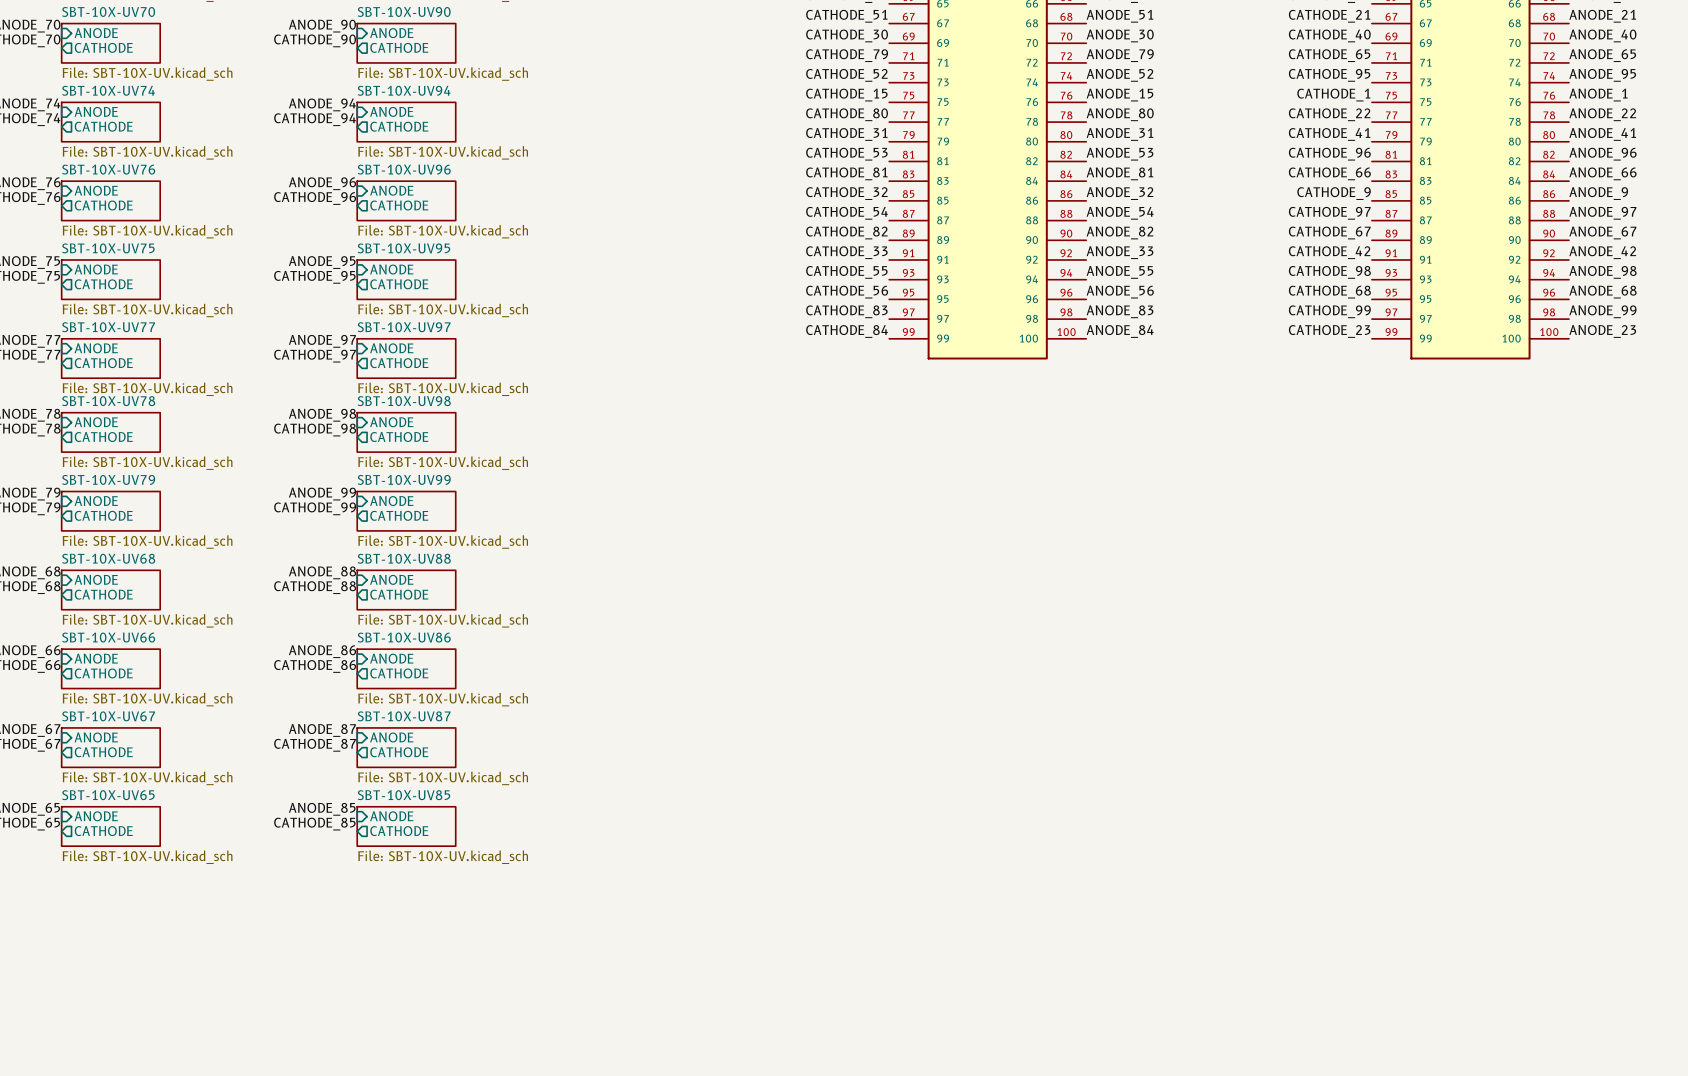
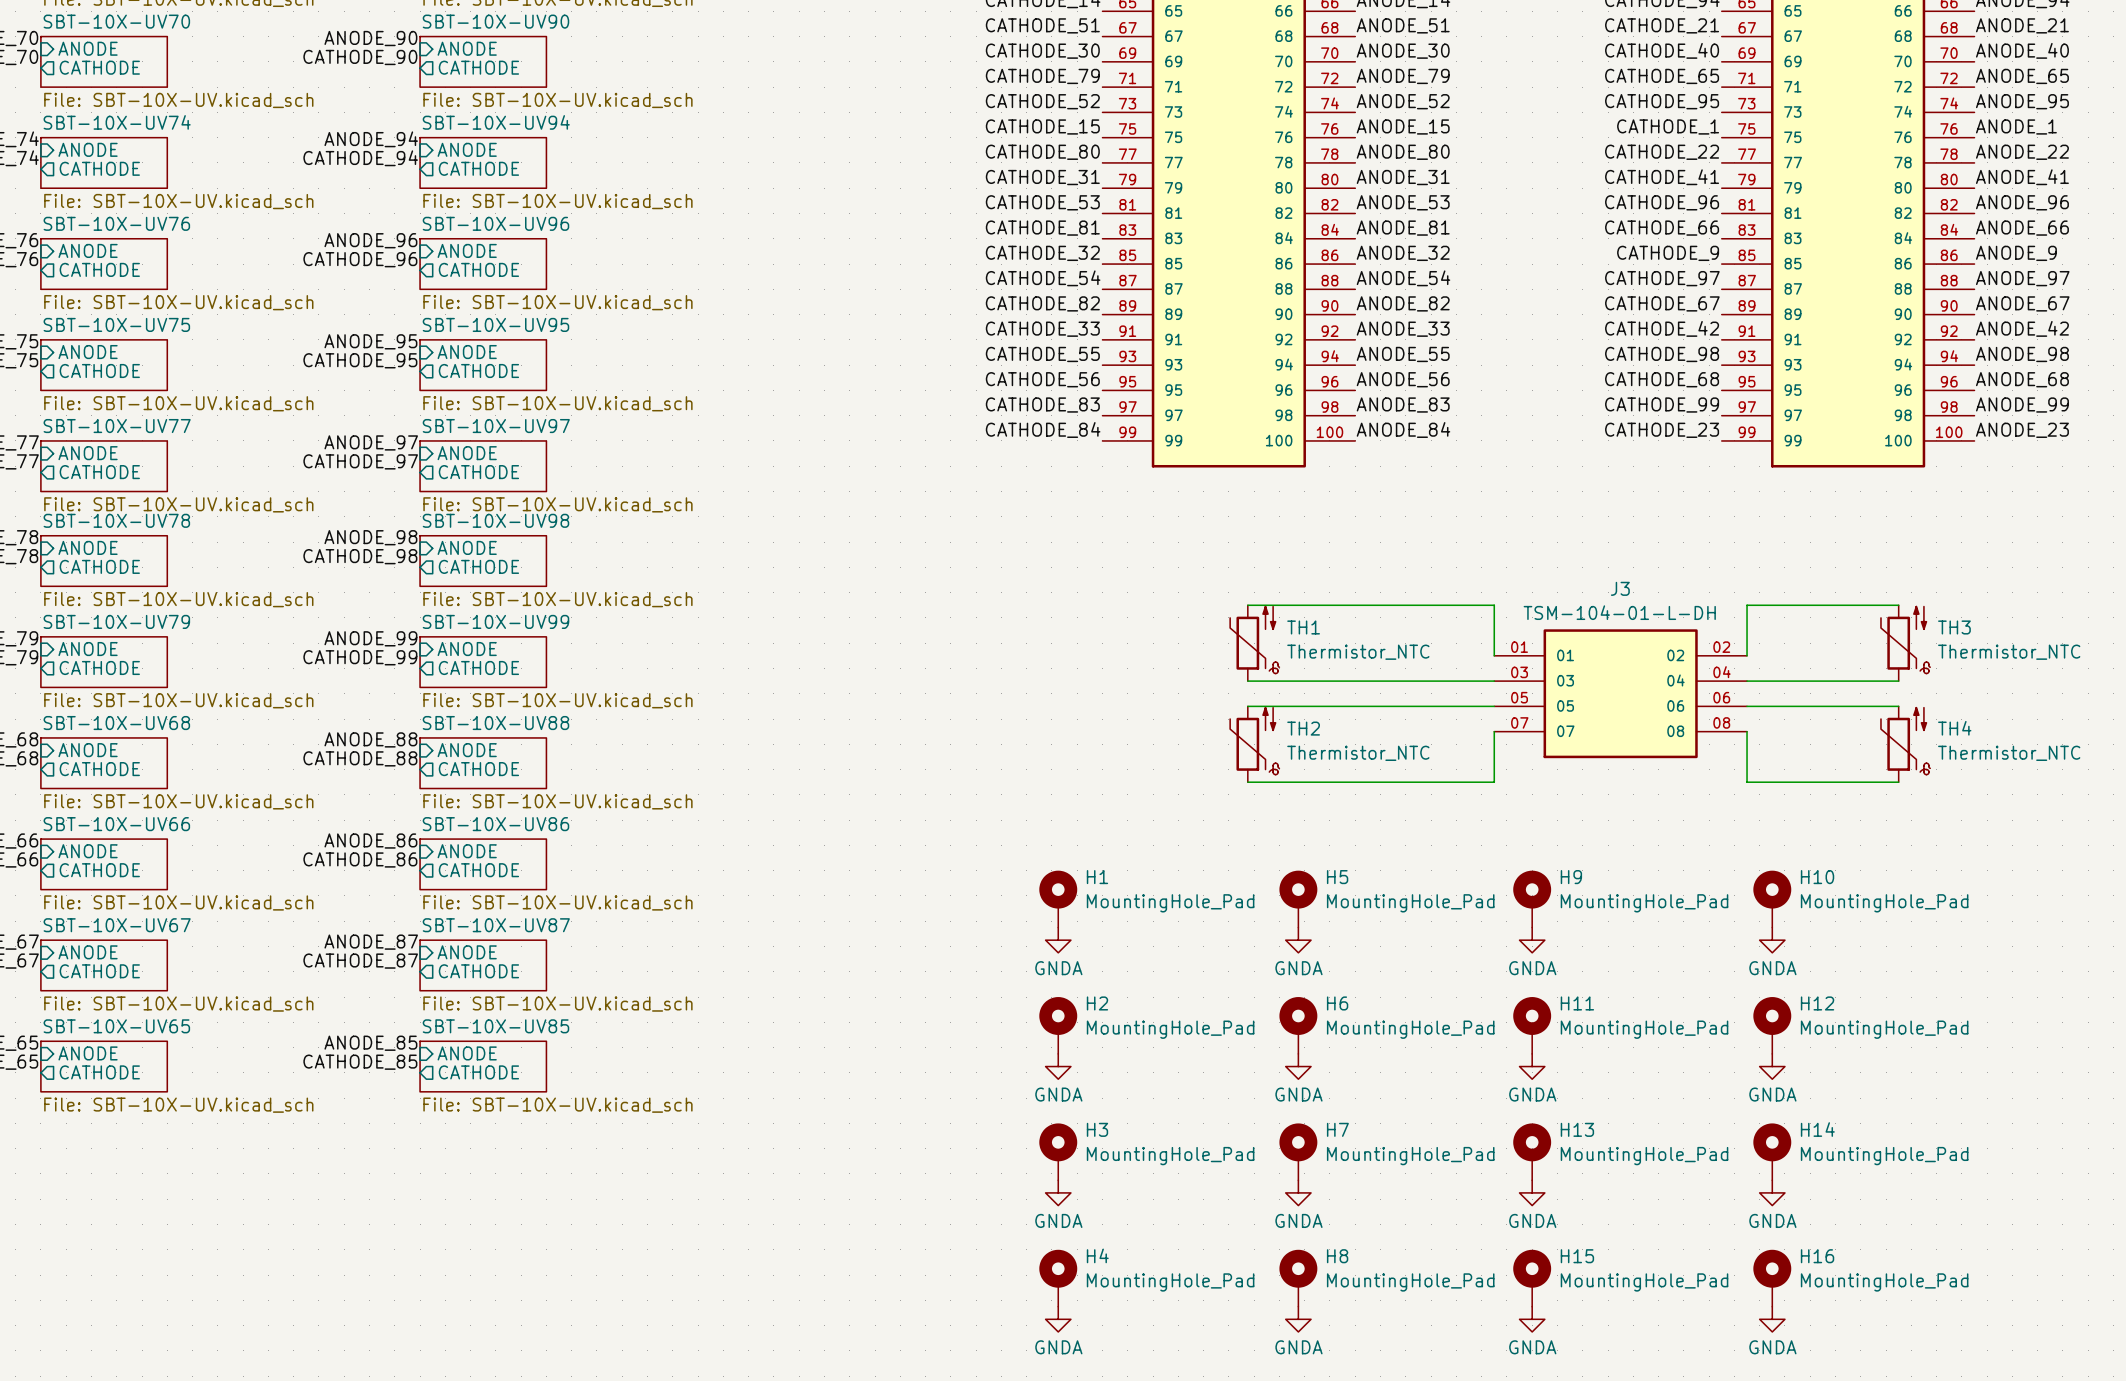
wire: none -> (1247, 605) (1494, 605) (1494, 655)
wire: none -> (1898, 605) (1747, 605) (1747, 655)
TH1: none -> Thermistor_NTC (1254, 643)
TH3: none -> Thermistor_NTC (1905, 643)
wire: none -> (1247, 681) (1494, 681)
wire: none -> (1747, 681) (1898, 681)
J3: none -> TSM-104-01-L-DH (1620, 693)
wire: none -> (1247, 706) (1494, 706)
wire: none -> (1747, 706) (1898, 706)
wire: none -> (1494, 731) (1494, 782) (1247, 782)
wire: none -> (1747, 731) (1747, 782) (1898, 782)
TH2: none -> Thermistor_NTC (1254, 744)
TH4: none -> Thermistor_NTC (1905, 744)
H1: none -> MountingHole_Pad (1058, 899)
H5: none -> MountingHole_Pad (1298, 899)
H9: none -> MountingHole_Pad (1532, 899)
H10: none -> MountingHole_Pad (1772, 899)
power symbol: none -> GNDA (1058, 940)
power symbol: none -> GNDA (1298, 940)
power symbol: none -> GNDA (1532, 940)
power symbol: none -> GNDA (1772, 940)
H2: none -> MountingHole_Pad (1058, 1025)
H6: none -> MountingHole_Pad (1298, 1025)
H11: none -> MountingHole_Pad (1532, 1025)
H12: none -> MountingHole_Pad (1772, 1025)
power symbol: none -> GNDA (1058, 1066)
power symbol: none -> GNDA (1298, 1066)
power symbol: none -> GNDA (1532, 1066)
power symbol: none -> GNDA (1772, 1066)
H3: none -> MountingHole_Pad (1058, 1151)
H7: none -> MountingHole_Pad (1298, 1151)
H13: none -> MountingHole_Pad (1532, 1151)
H14: none -> MountingHole_Pad (1772, 1151)
power symbol: none -> GNDA (1058, 1192)
power symbol: none -> GNDA (1298, 1192)
power symbol: none -> GNDA (1532, 1192)
power symbol: none -> GNDA (1772, 1192)
H4: none -> MountingHole_Pad (1058, 1278)
H8: none -> MountingHole_Pad (1298, 1278)
H15: none -> MountingHole_Pad (1532, 1278)
H16: none -> MountingHole_Pad (1772, 1278)
power symbol: none -> GNDA (1058, 1319)
power symbol: none -> GNDA (1298, 1319)
power symbol: none -> GNDA (1532, 1319)
power symbol: none -> GNDA (1772, 1319)

